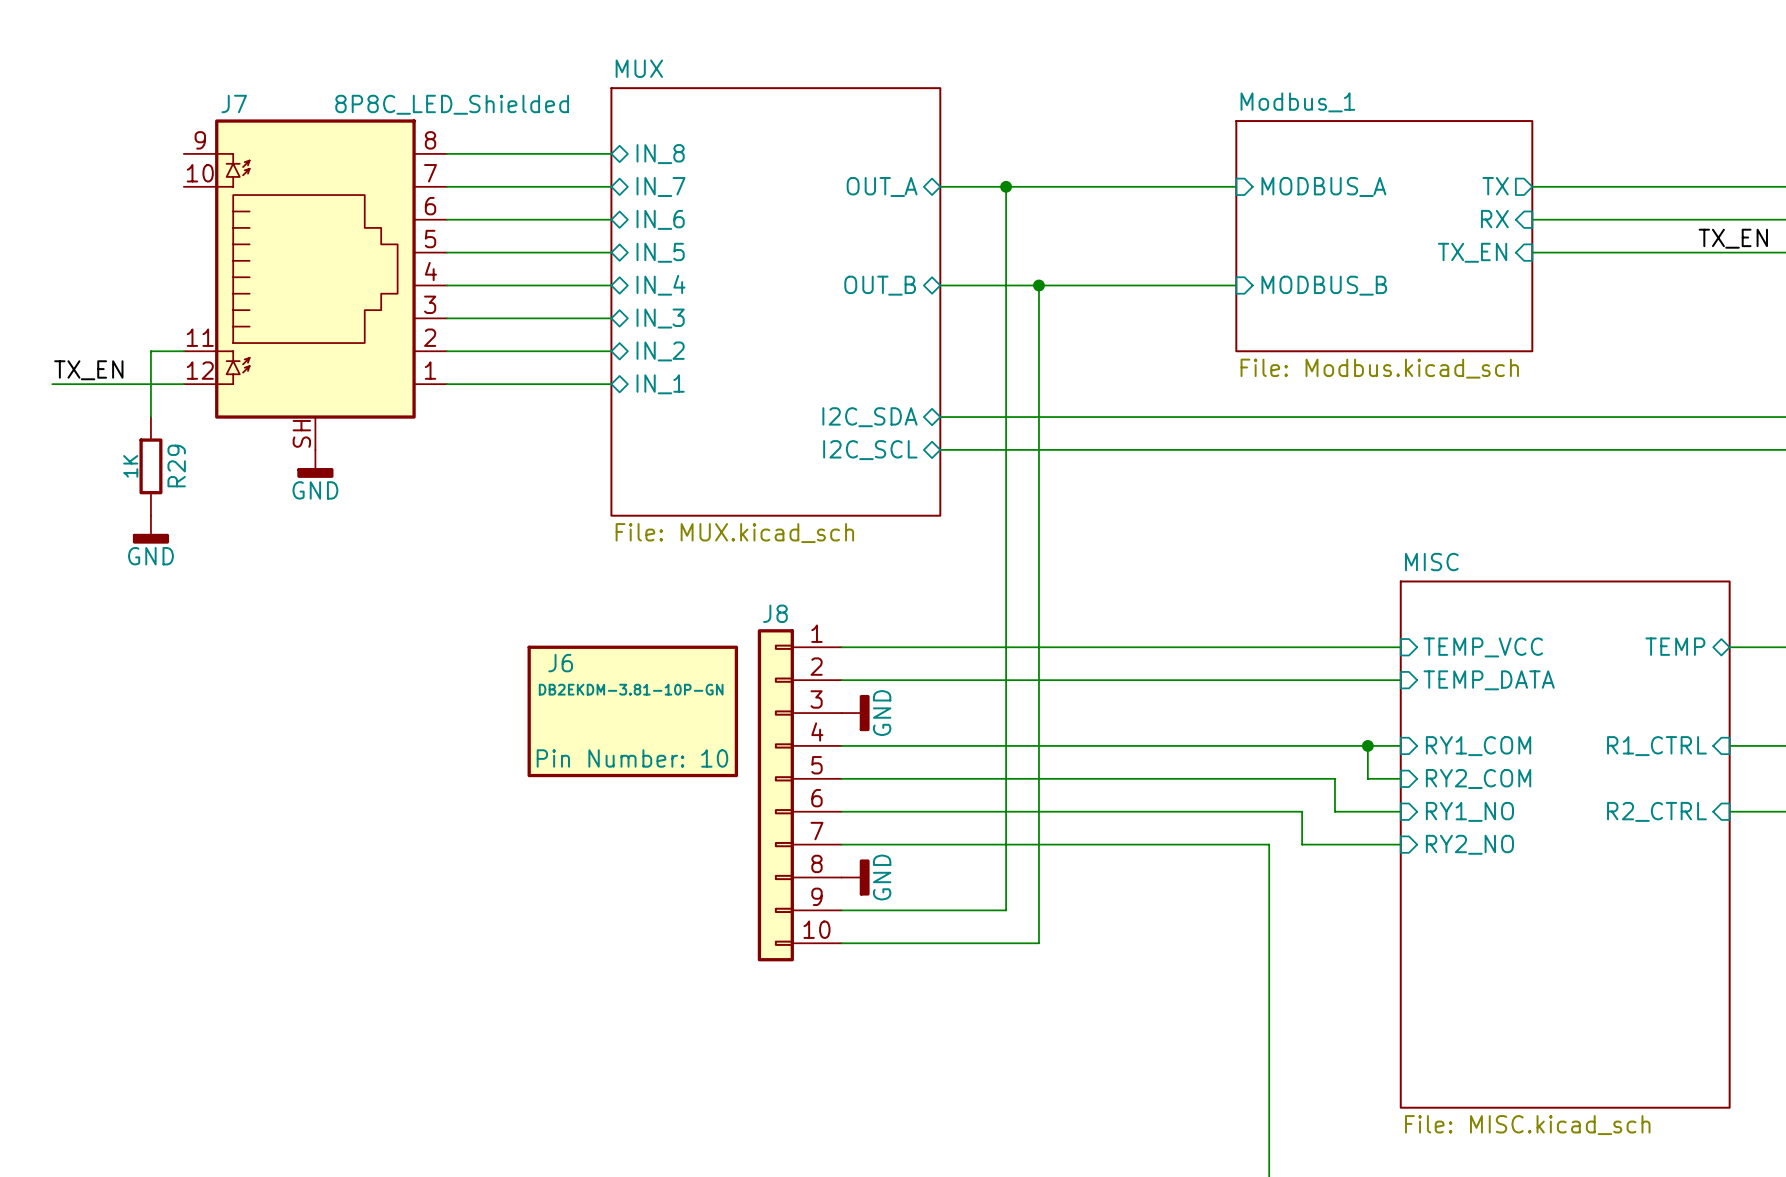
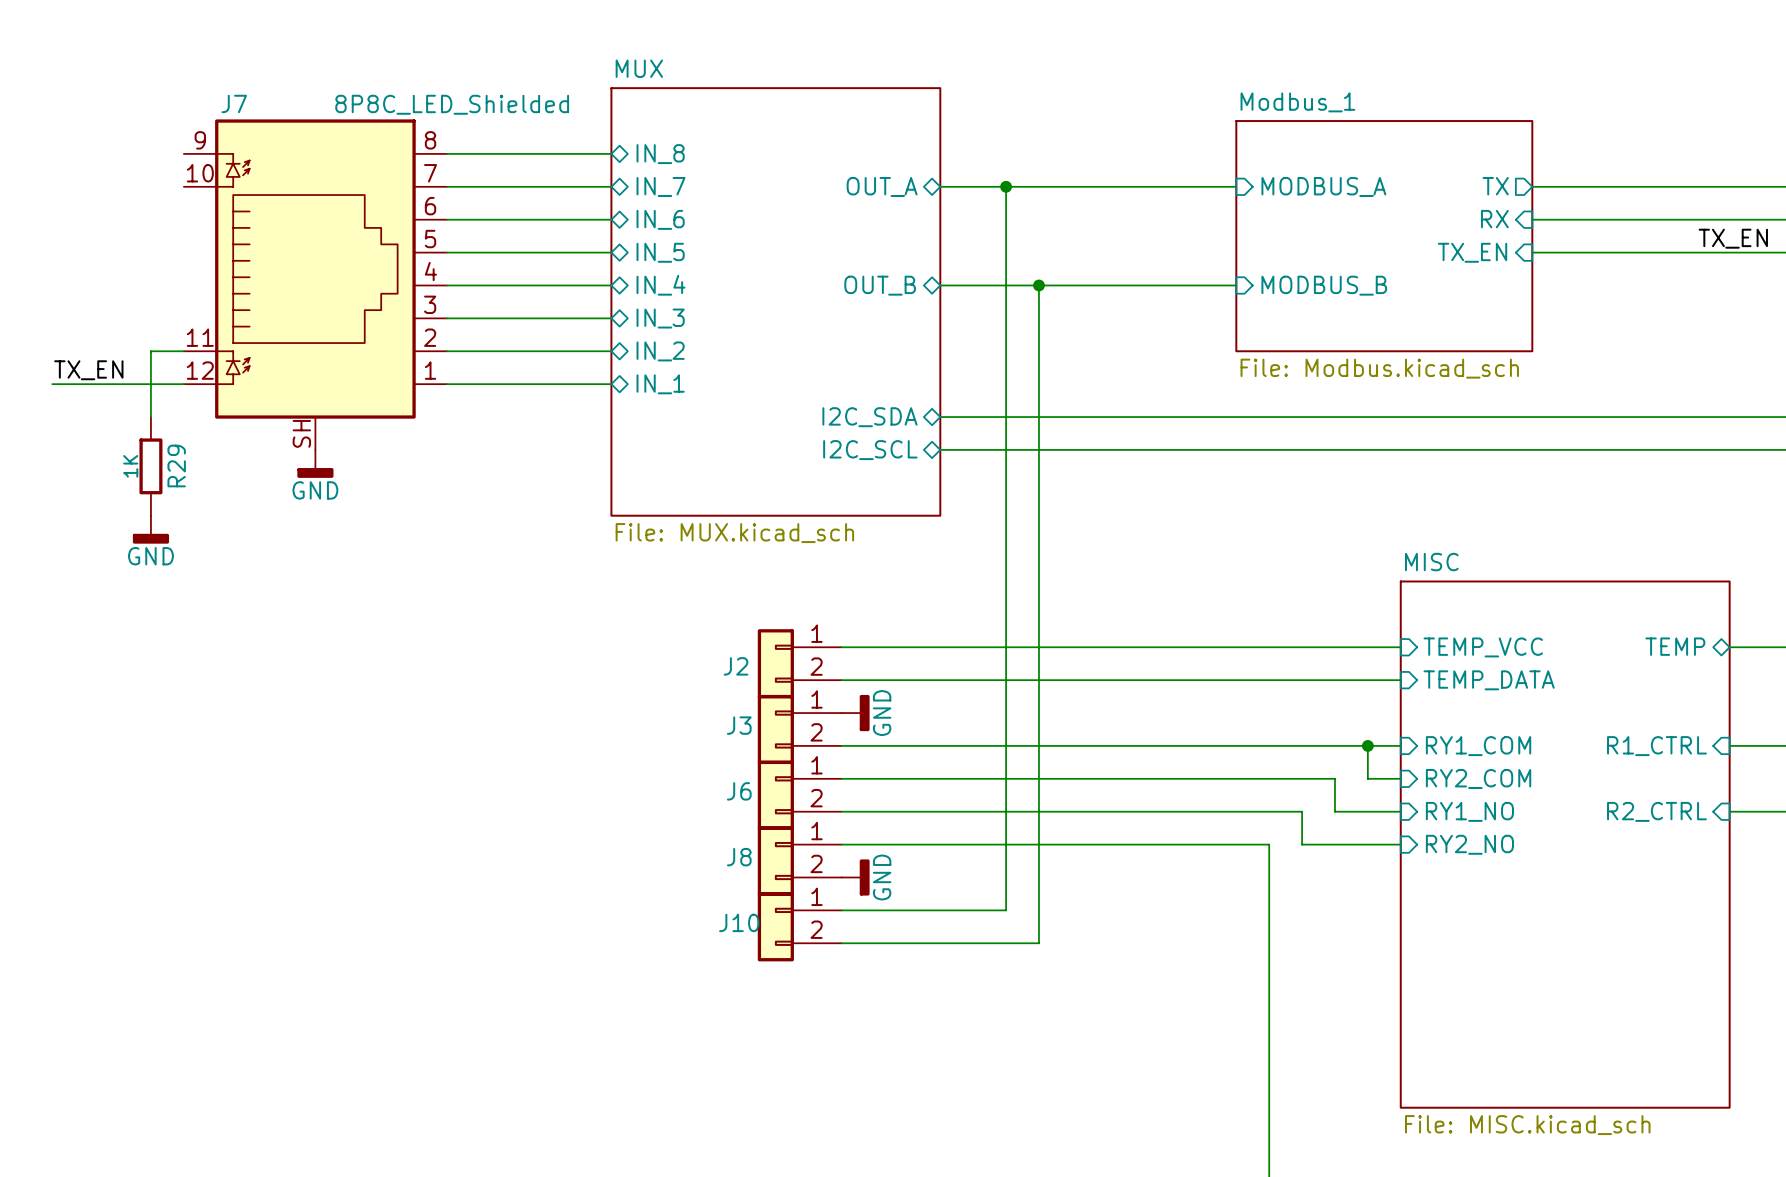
J8 name position: J8 (775, 613) -> J8 (739, 857)
J8 symbol: [757, 629, 842, 962] -> [757, 826, 842, 896]
J6 symbol: [527, 645, 739, 778] -> [757, 760, 842, 830]
J6 name position: J6 (560, 663) -> J6 (739, 791)
J2: none -> (799, 663)
J6 value: DB2EKDM-3.81-10P-GN (631, 689) -> none
J3: none -> (799, 729)
J6 text: Pin Number: 10 (632, 758) -> none
J10: none -> (799, 926)

